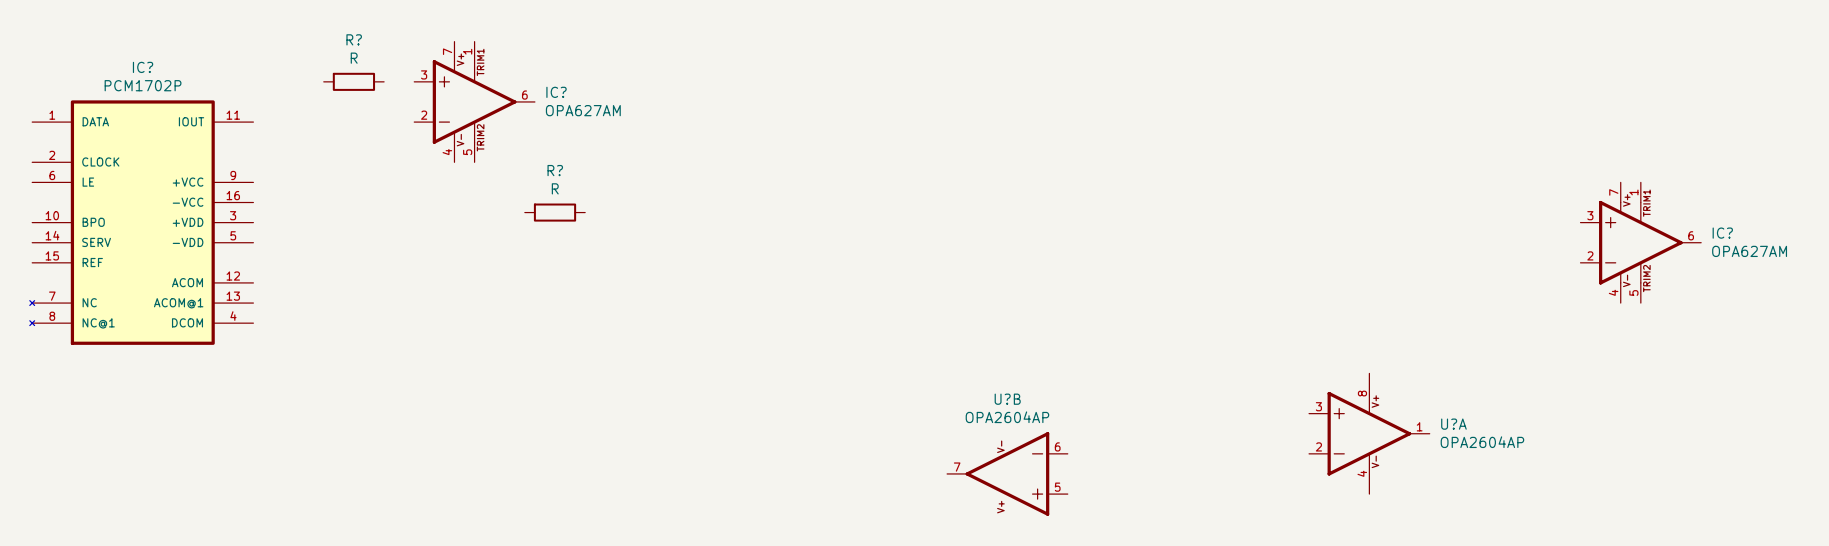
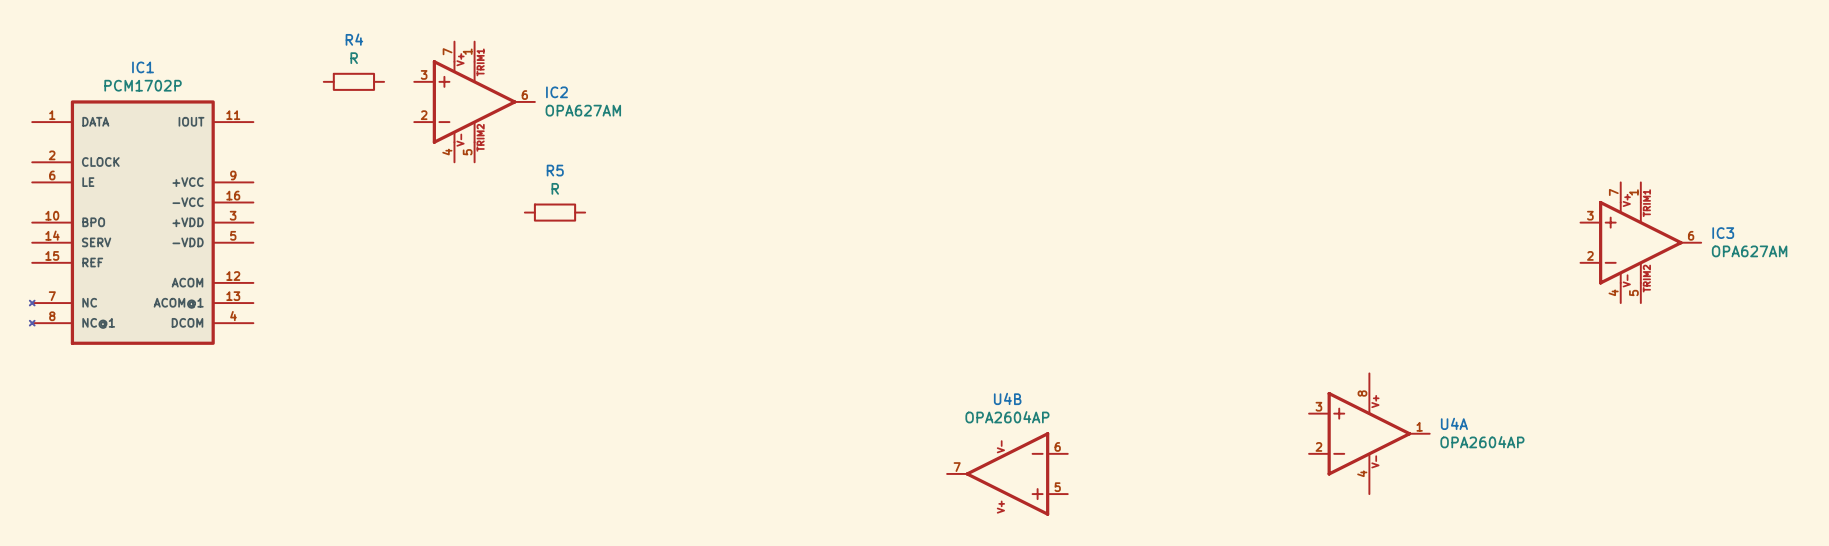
R? name: R? (354, 39) -> R4 (354, 39)
IC? name: IC? (143, 67) -> IC1 (143, 67)
IC? name: IC? (556, 92) -> IC2 (556, 92)
R? name: R? (555, 170) -> R5 (555, 170)
IC? name: IC? (1722, 233) -> IC3 (1723, 233)
U?B name: U?B (1007, 399) -> U4B (1007, 398)
U?A name: U?A (1453, 424) -> U4A (1454, 423)

